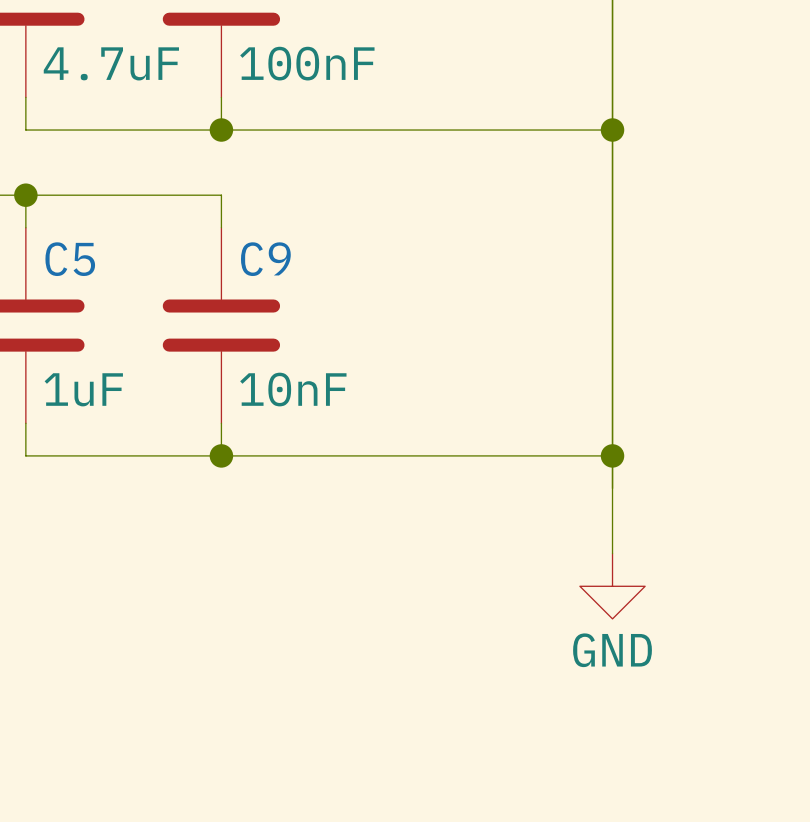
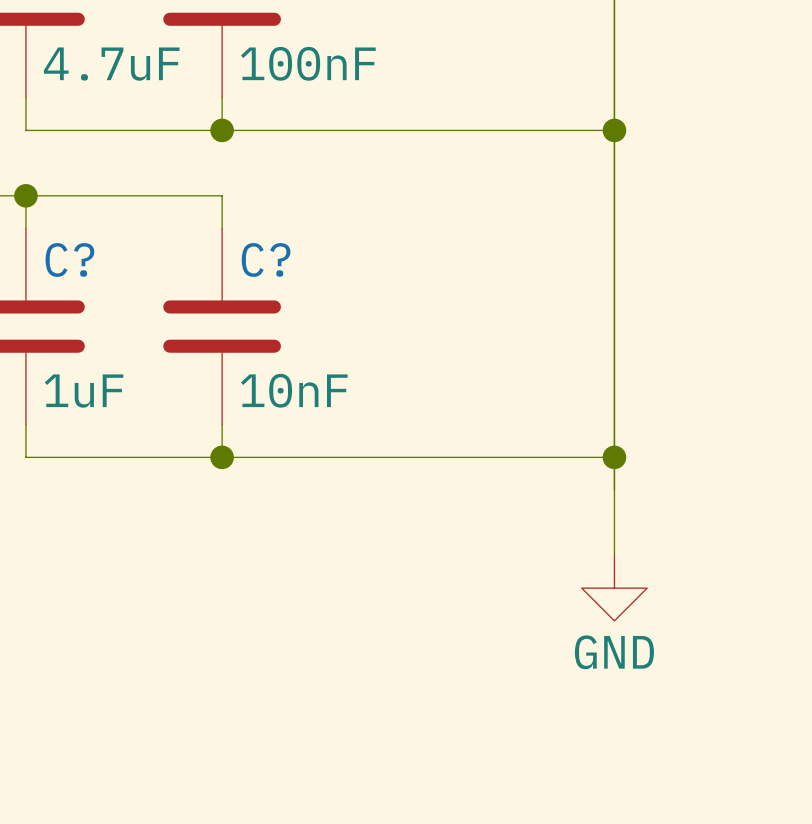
C5 name: C5 (70, 259) -> C? (69, 259)
C9 name: C9 (265, 259) -> C? (266, 259)

